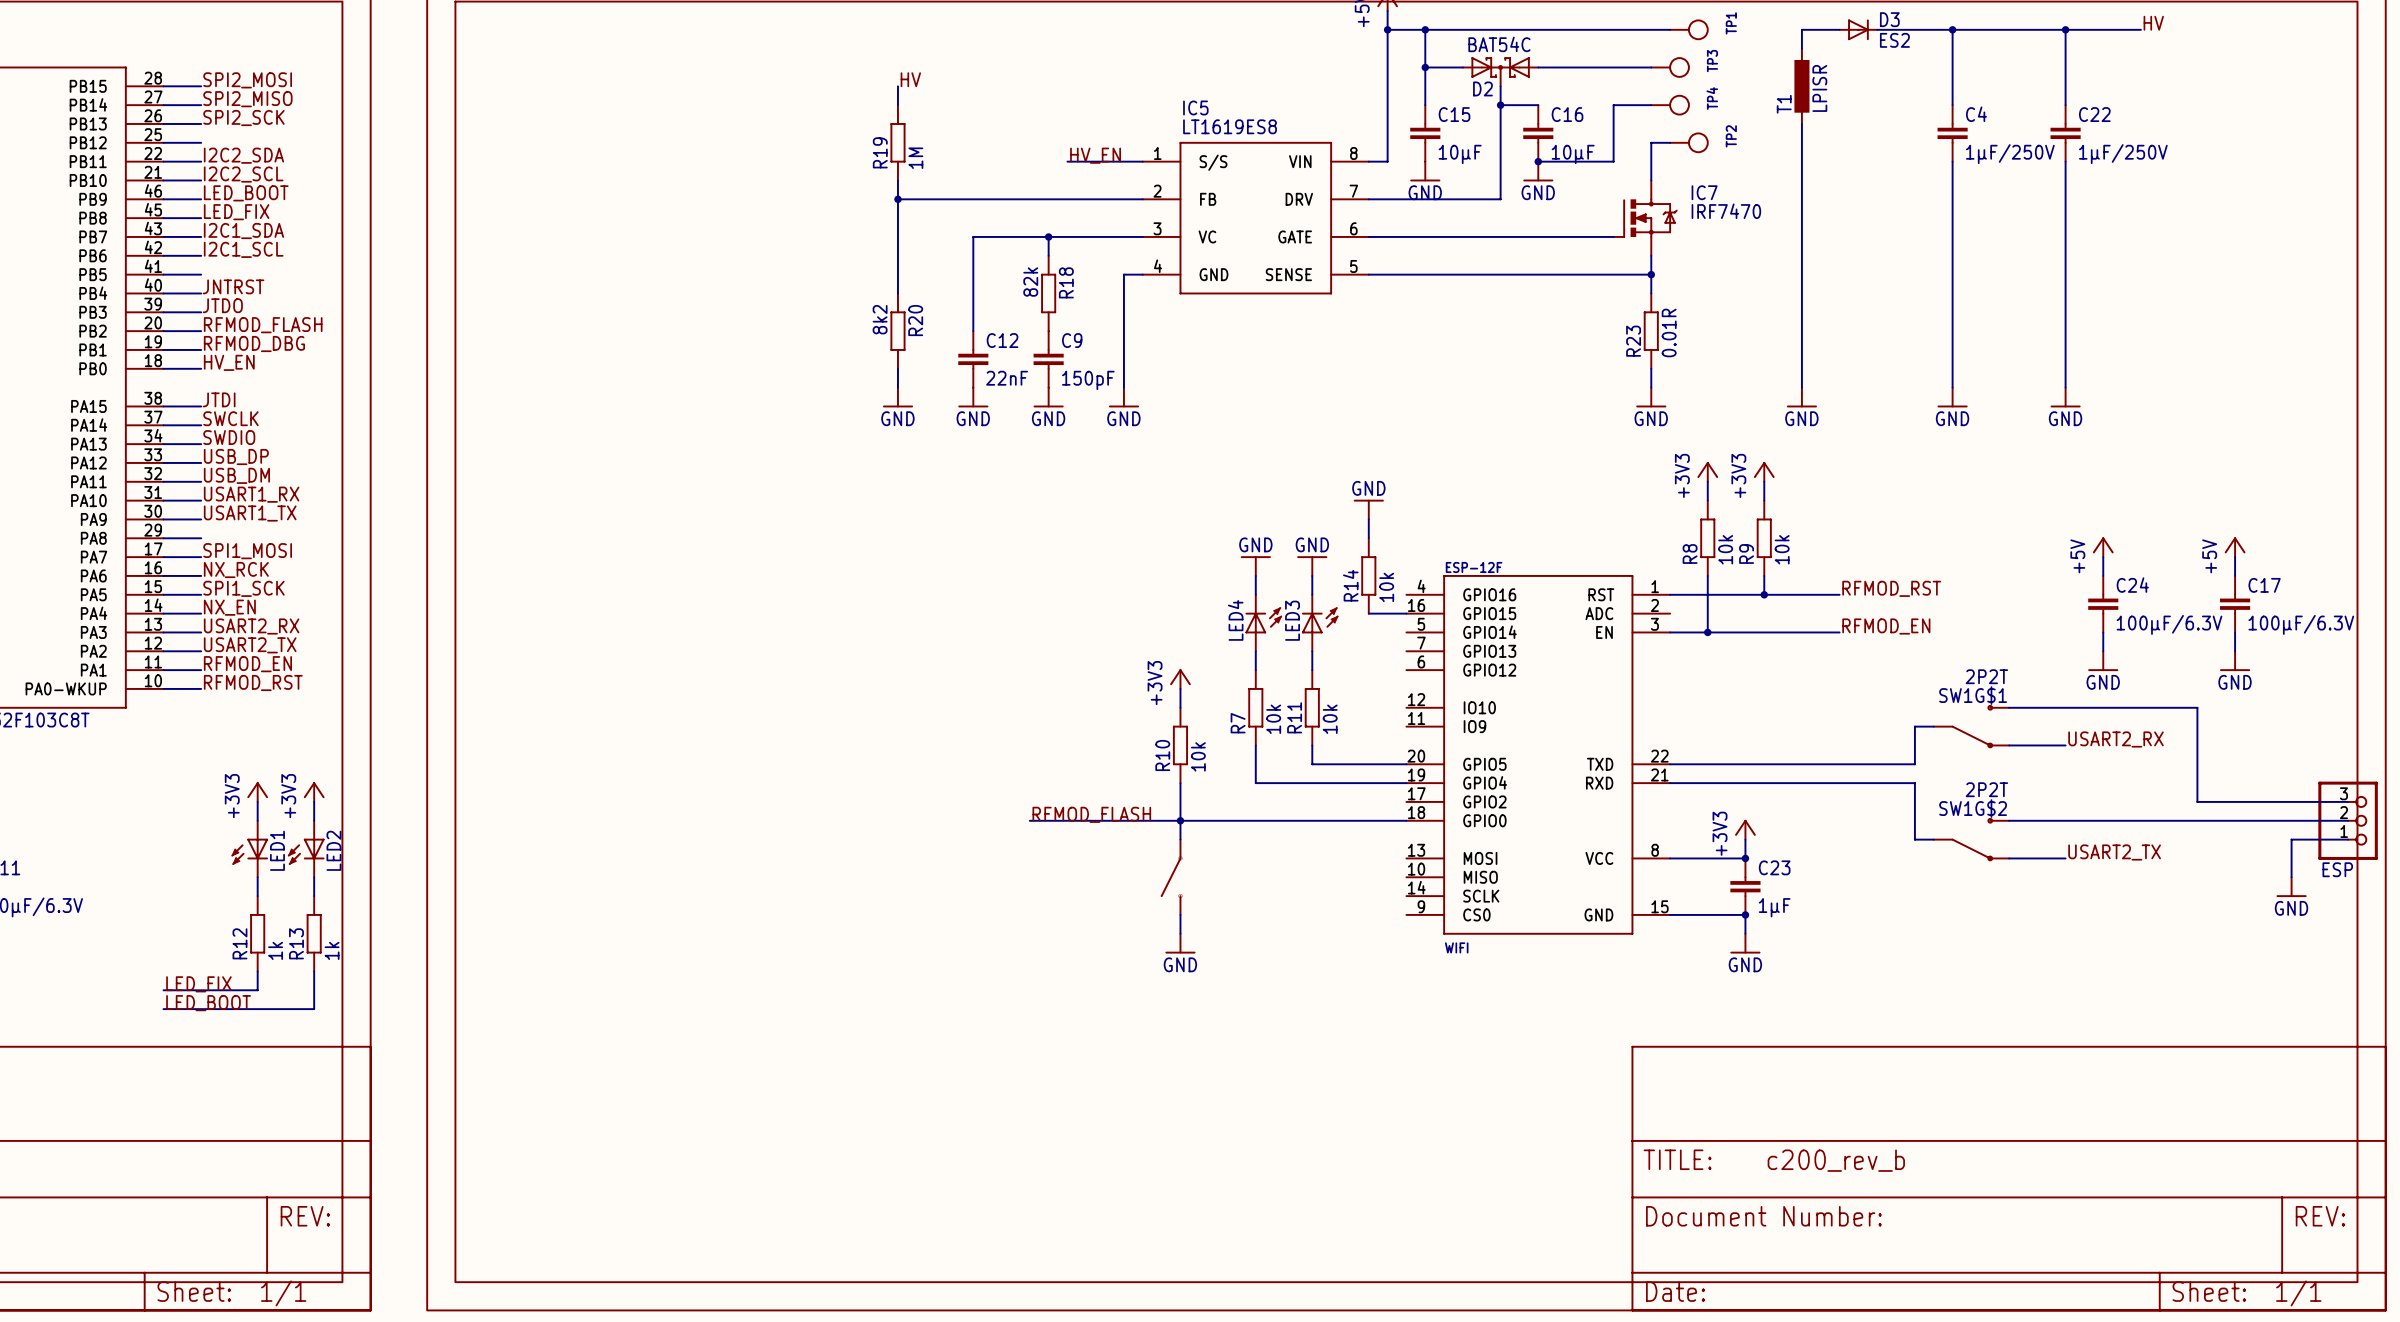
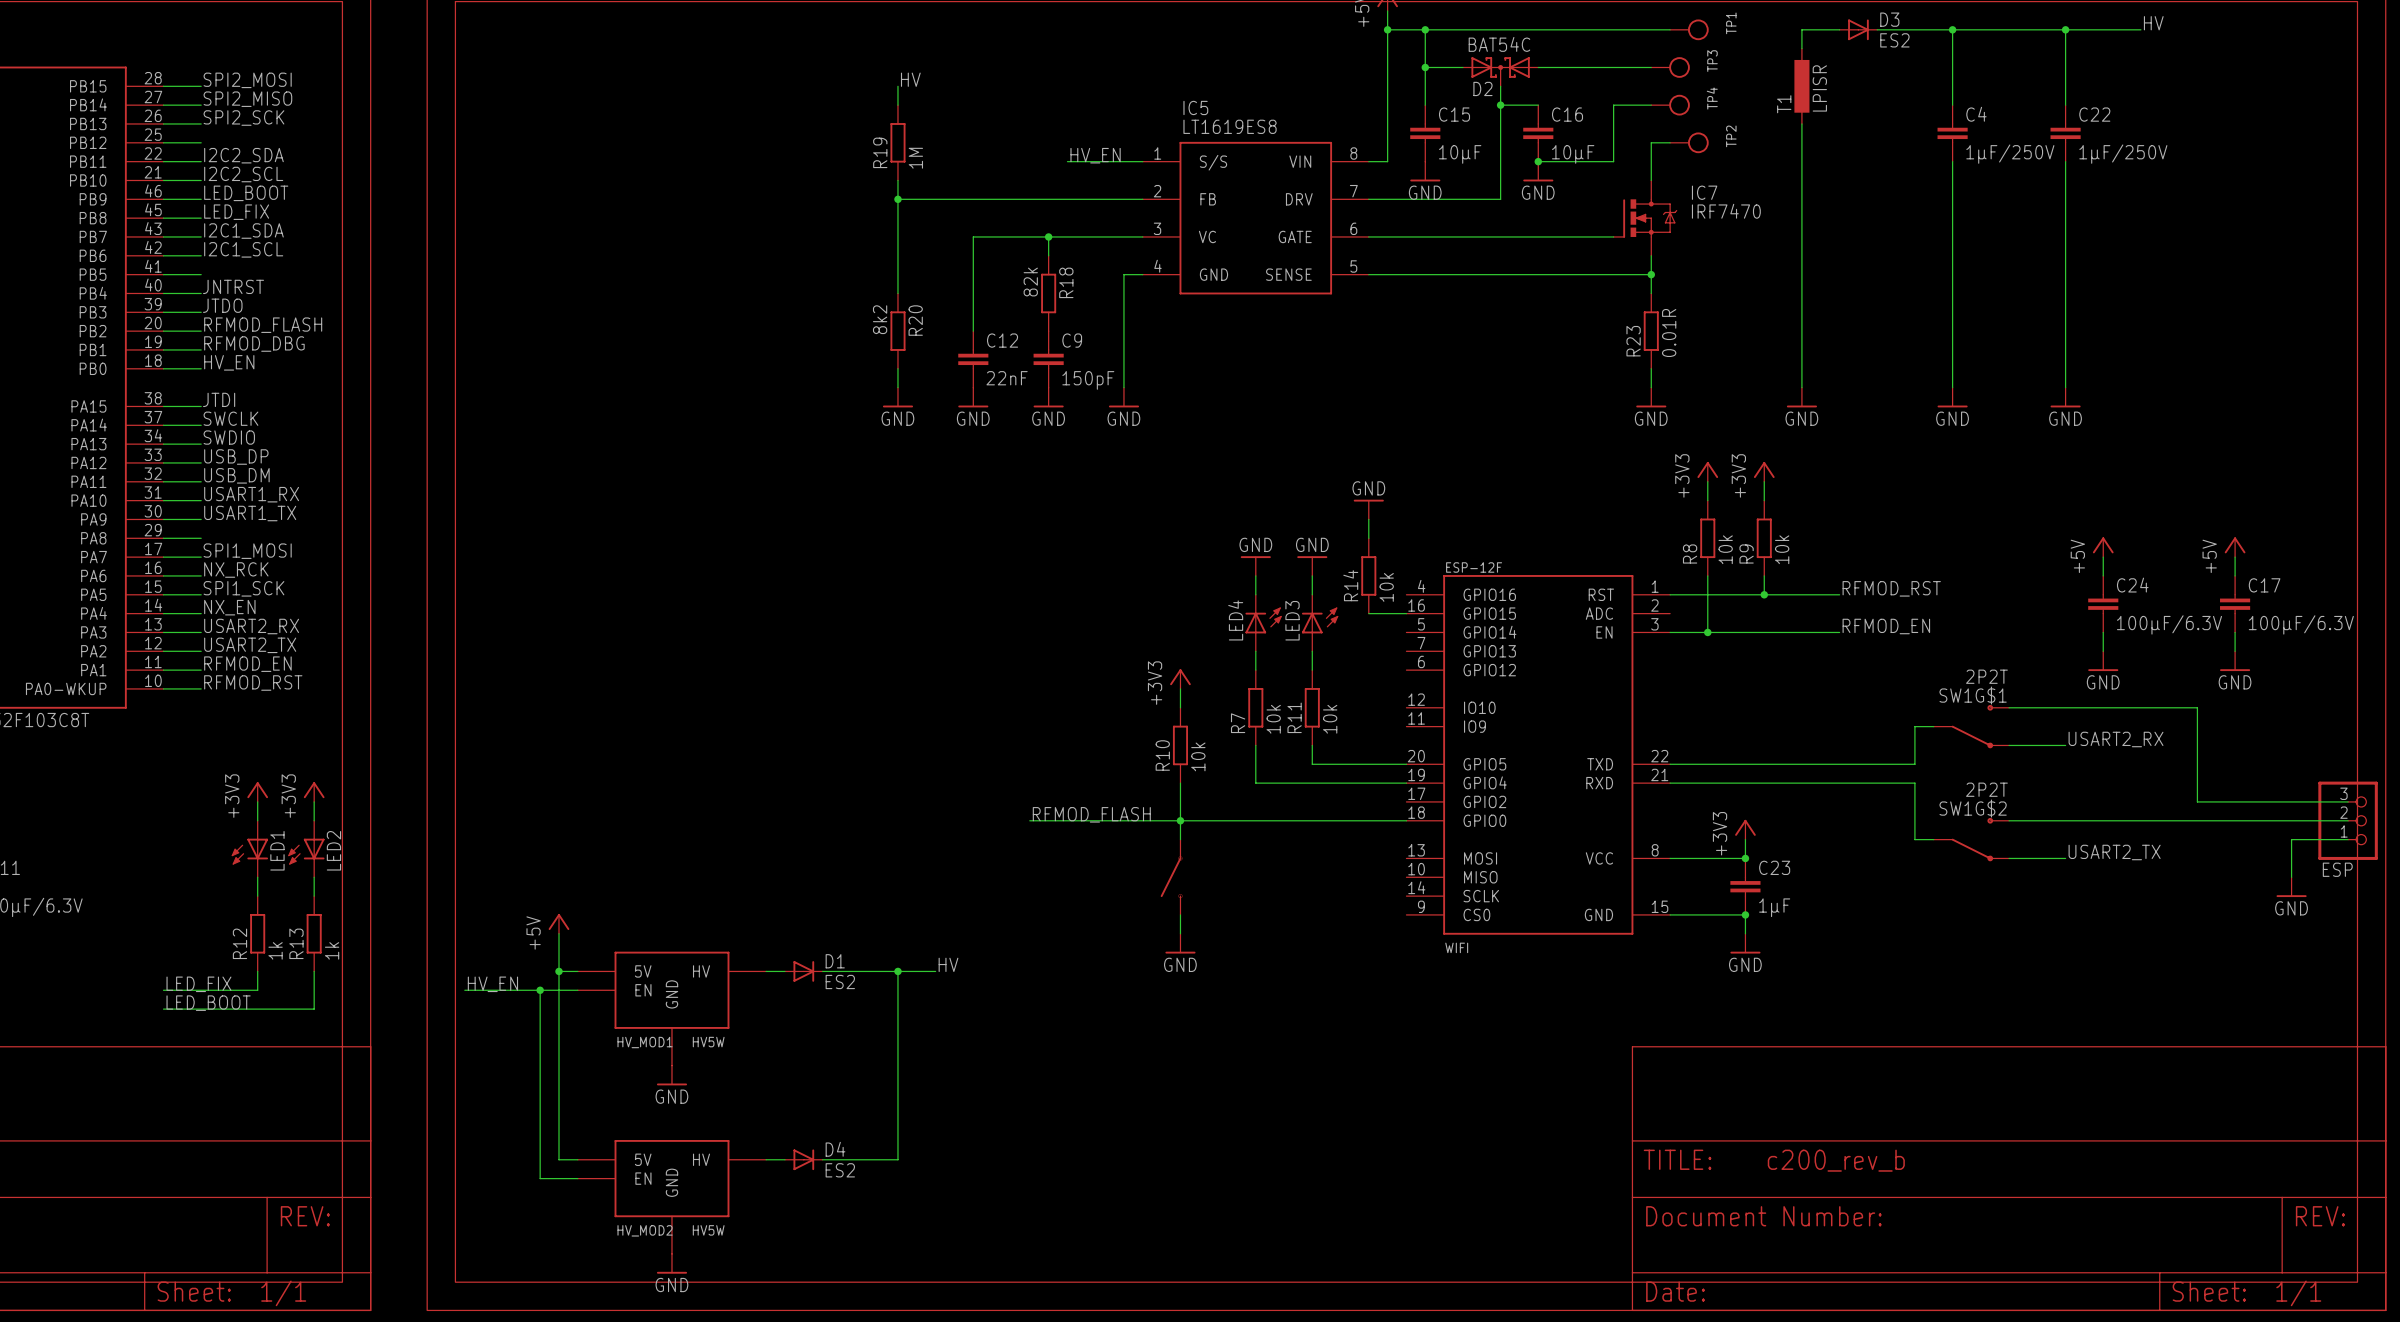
power symbol: none -> +5V (559, 923)
wire: none -> (559, 933) (559, 1159) (577, 1159)
label: none -> HV (948, 964)
wire: none -> (559, 971) (577, 971)
junction: none -> (559, 971)
wire: none -> (766, 971) (784, 971)
D1: none -> ES2 (803, 971)
wire: none -> (822, 971) (935, 971)
wire: none -> (897, 971) (897, 1159) (822, 1159)
junction: none -> (897, 971)
label: none -> HV_EN (492, 984)
wire: none -> (464, 990) (577, 990)
wire: none -> (540, 990) (540, 1178) (577, 1178)
junction: none -> (540, 990)
HV_MOD1: none -> HV5W (671, 1008)
power symbol: none -> GND (671, 1075)
wire: none -> (766, 1159) (784, 1159)
D4: none -> ES2 (803, 1159)
HV_MOD2: none -> HV5W (671, 1196)
power symbol: none -> GND (671, 1263)

